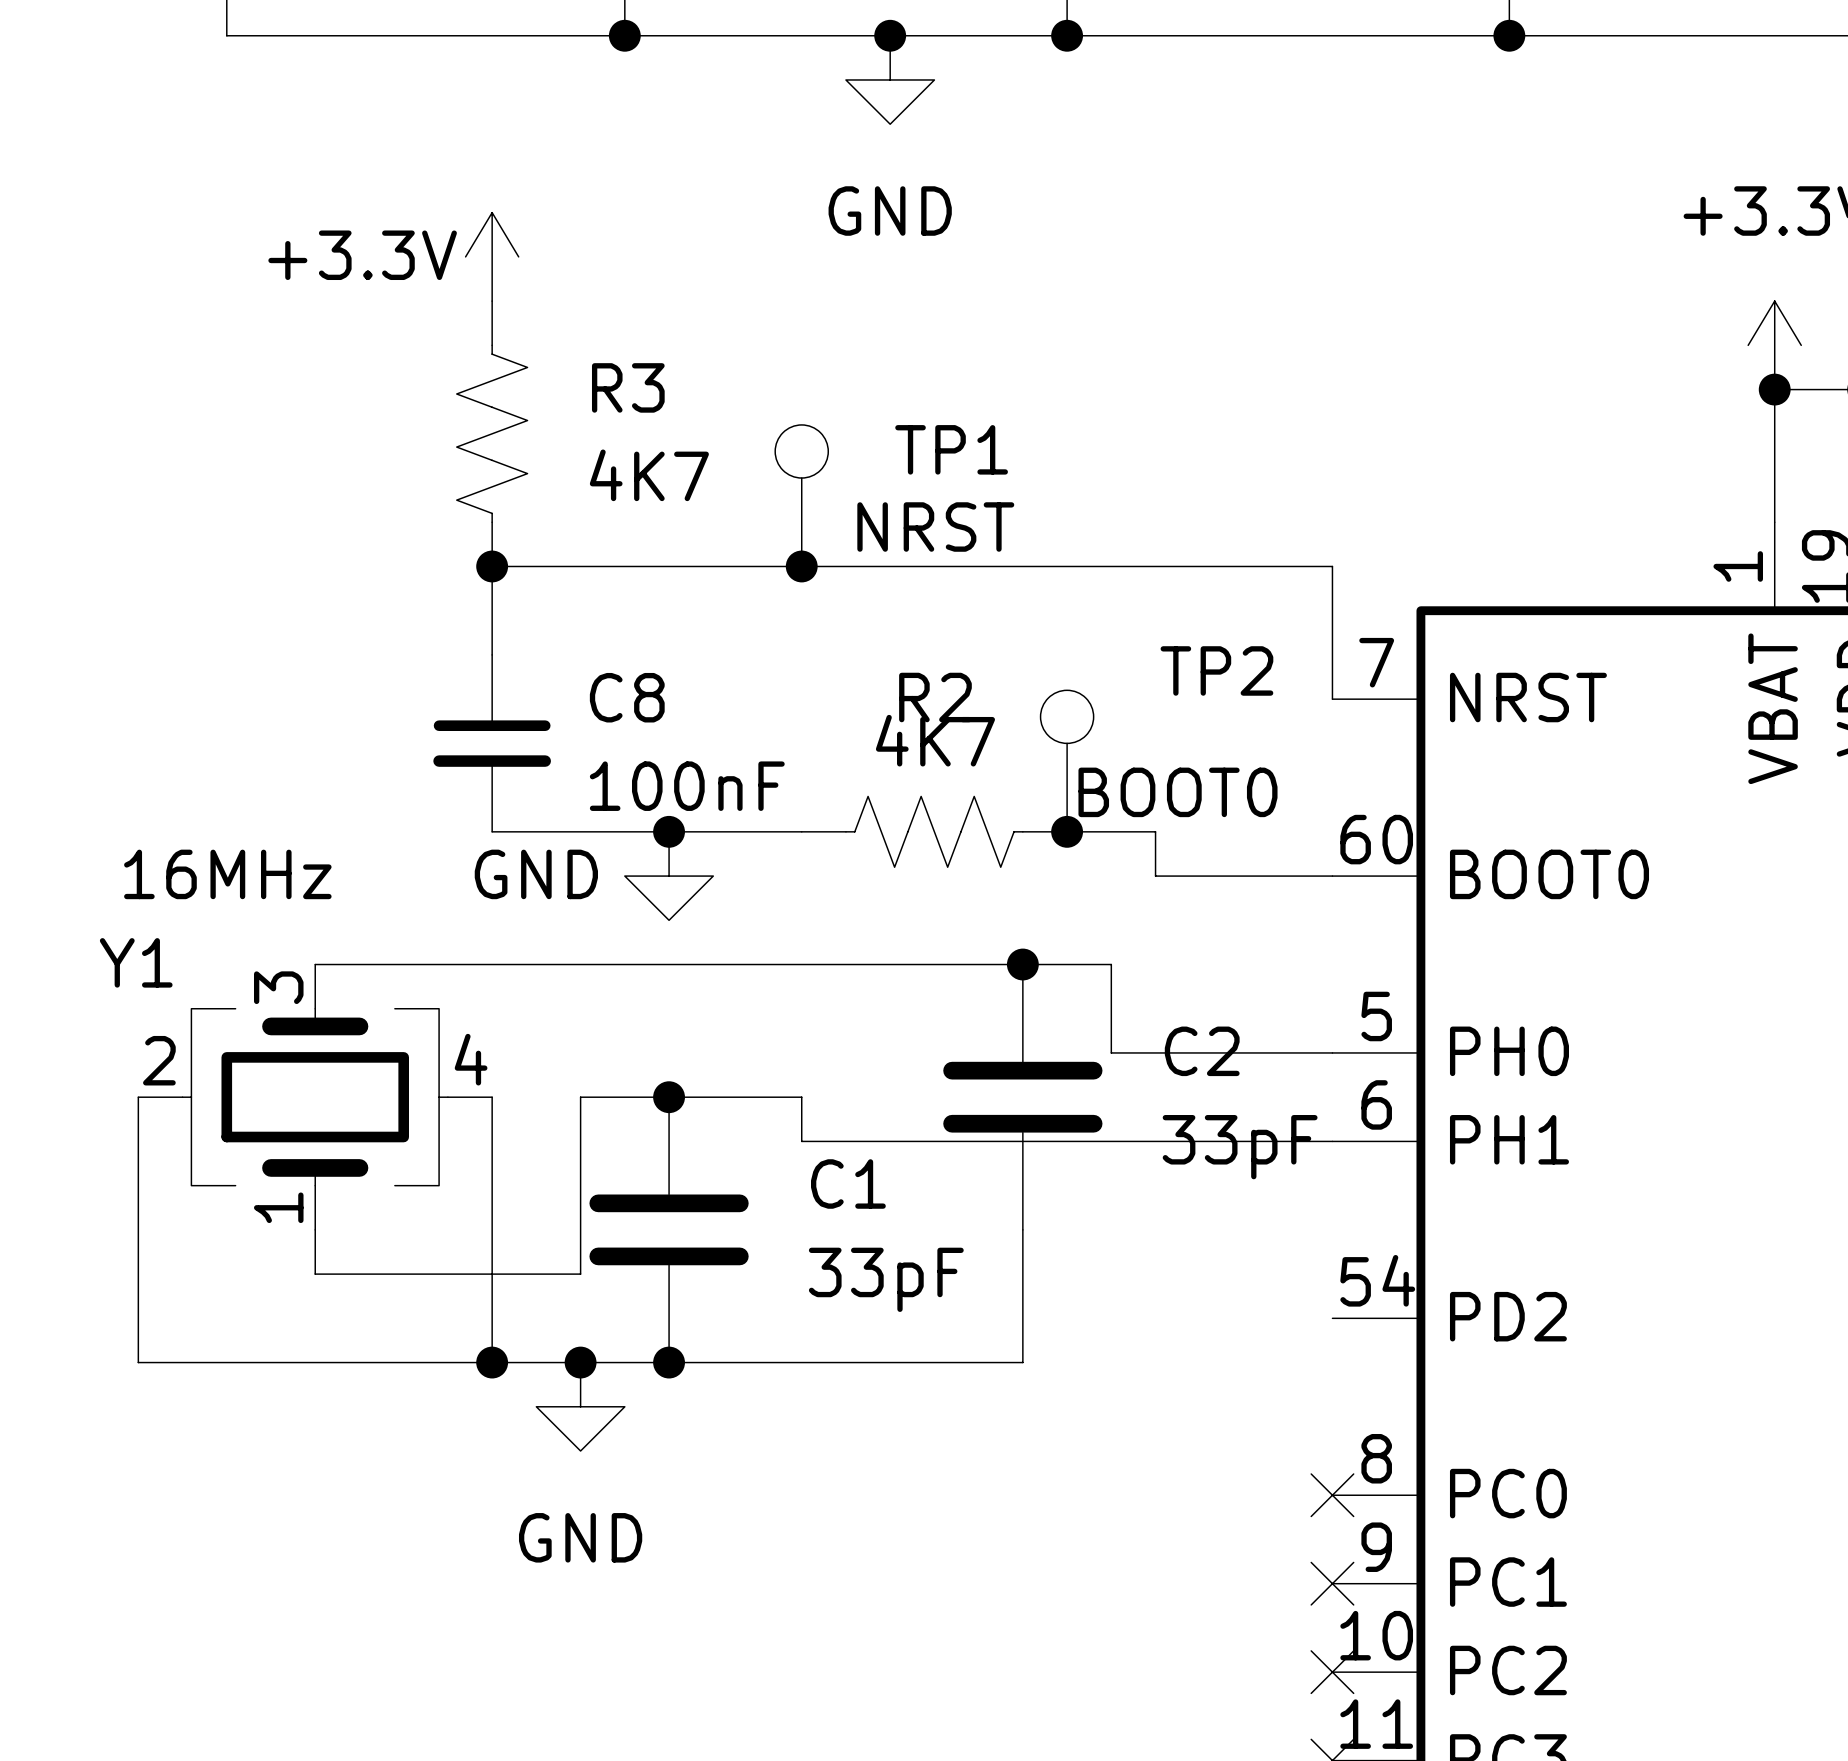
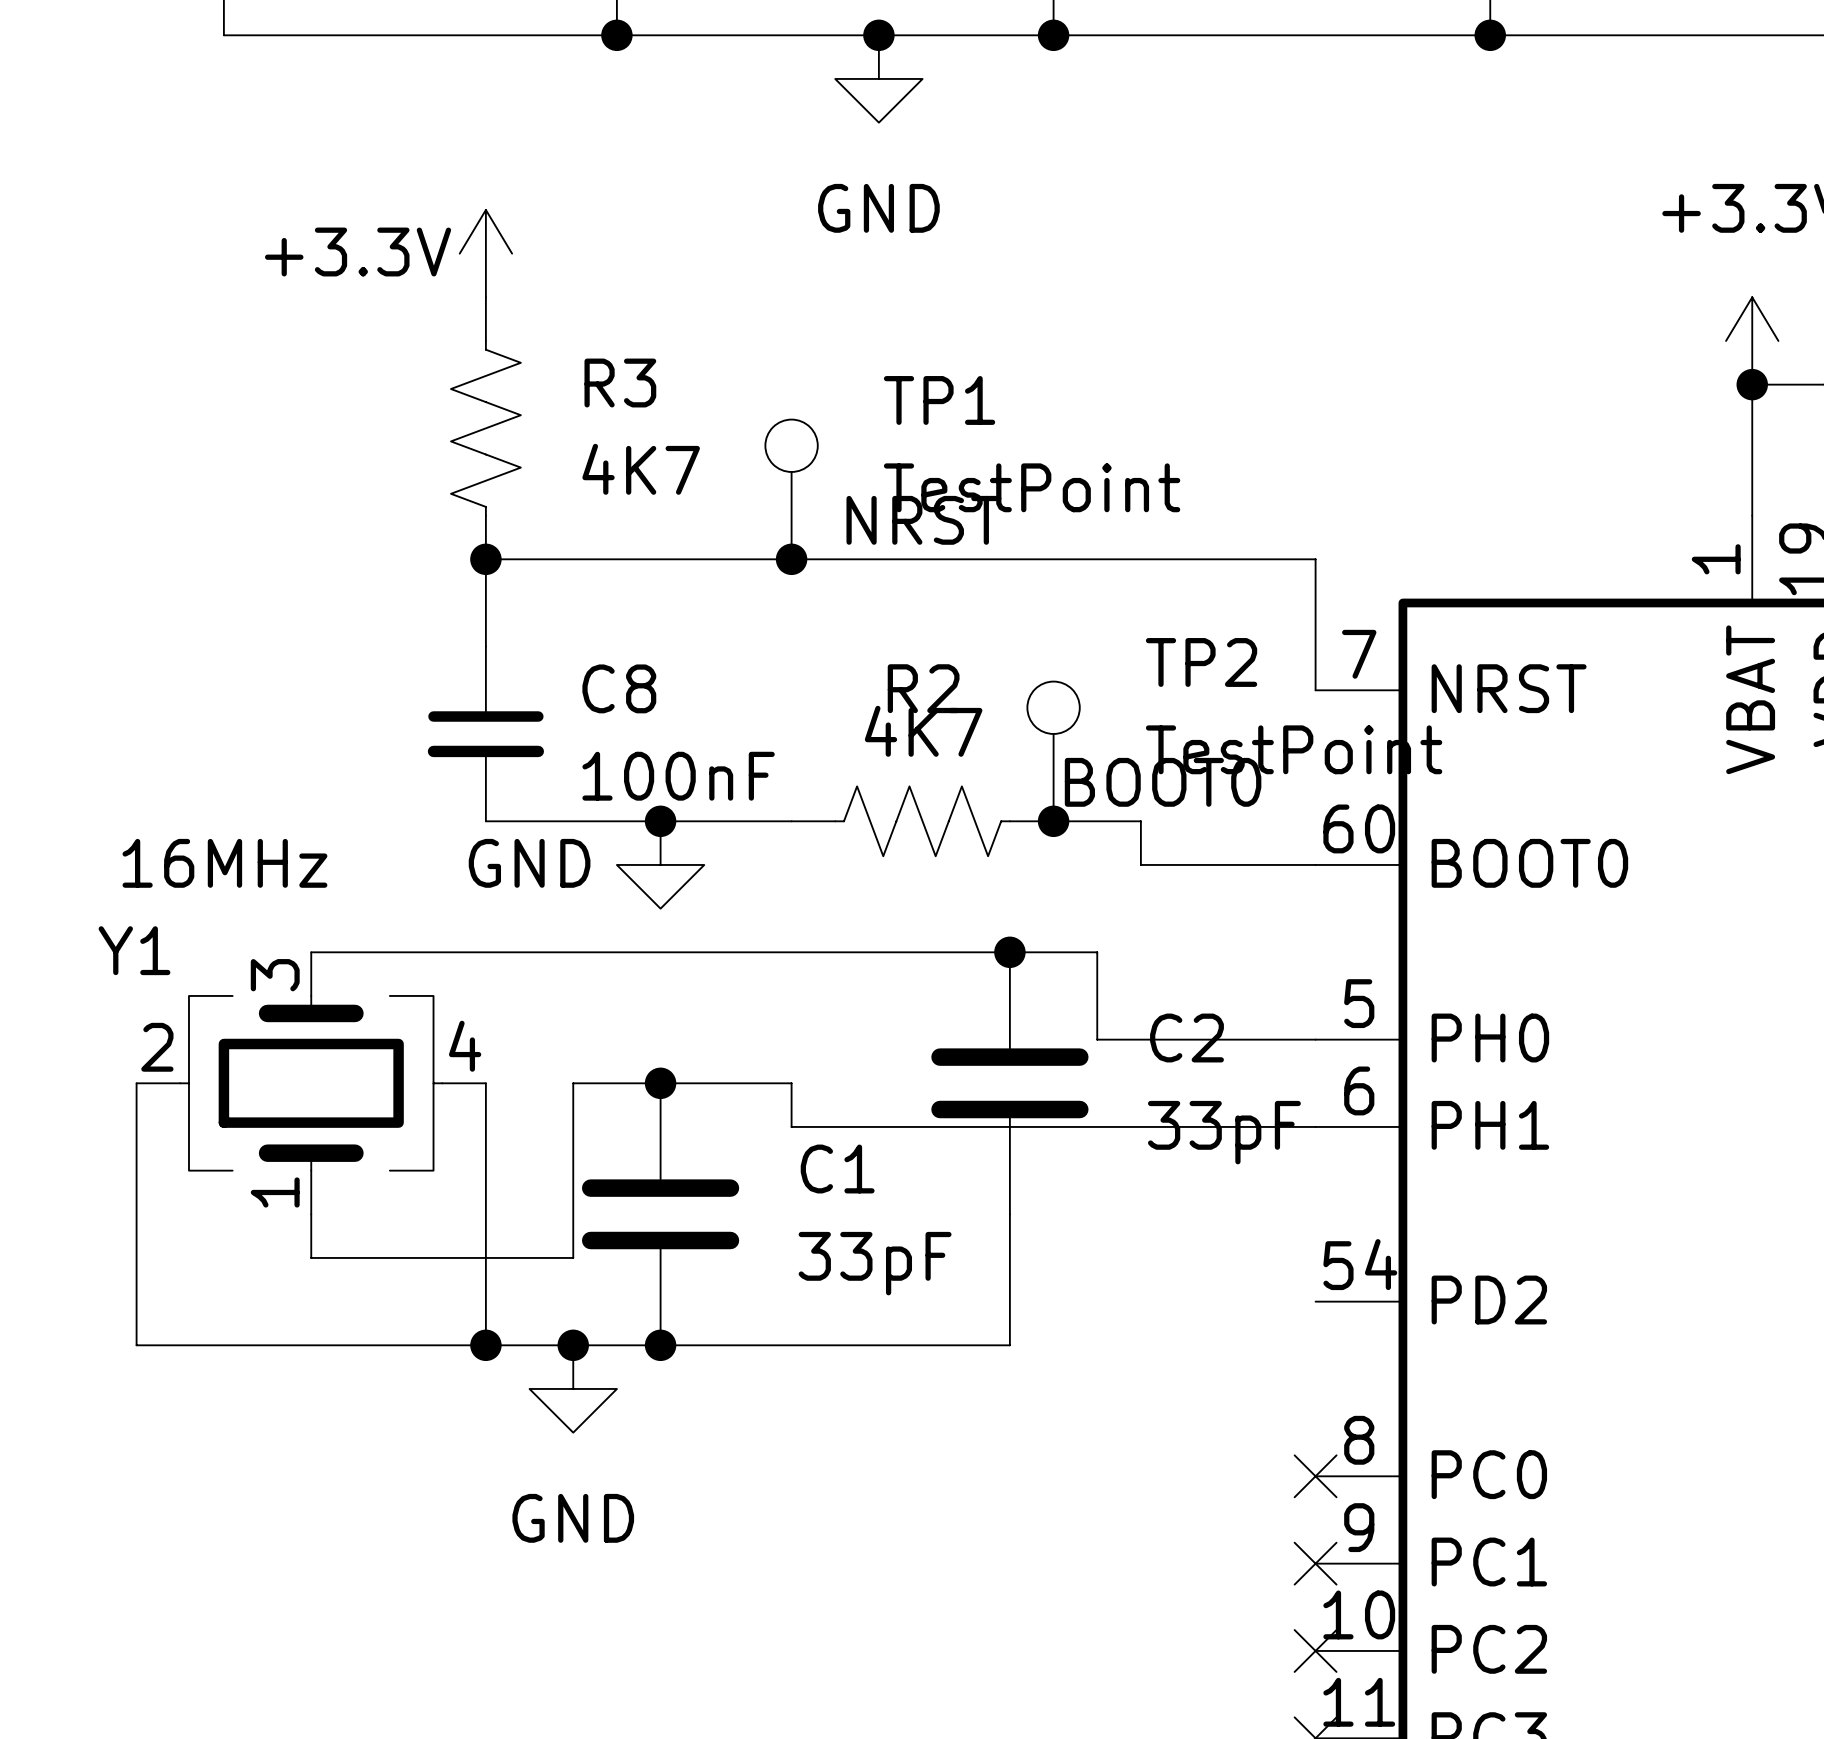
TP1 name position: TP1 (951, 449) -> TP1 (939, 400)
TP1 value: none -> TestPoint (1032, 487)
TP2 value: none -> TestPoint (1294, 749)

